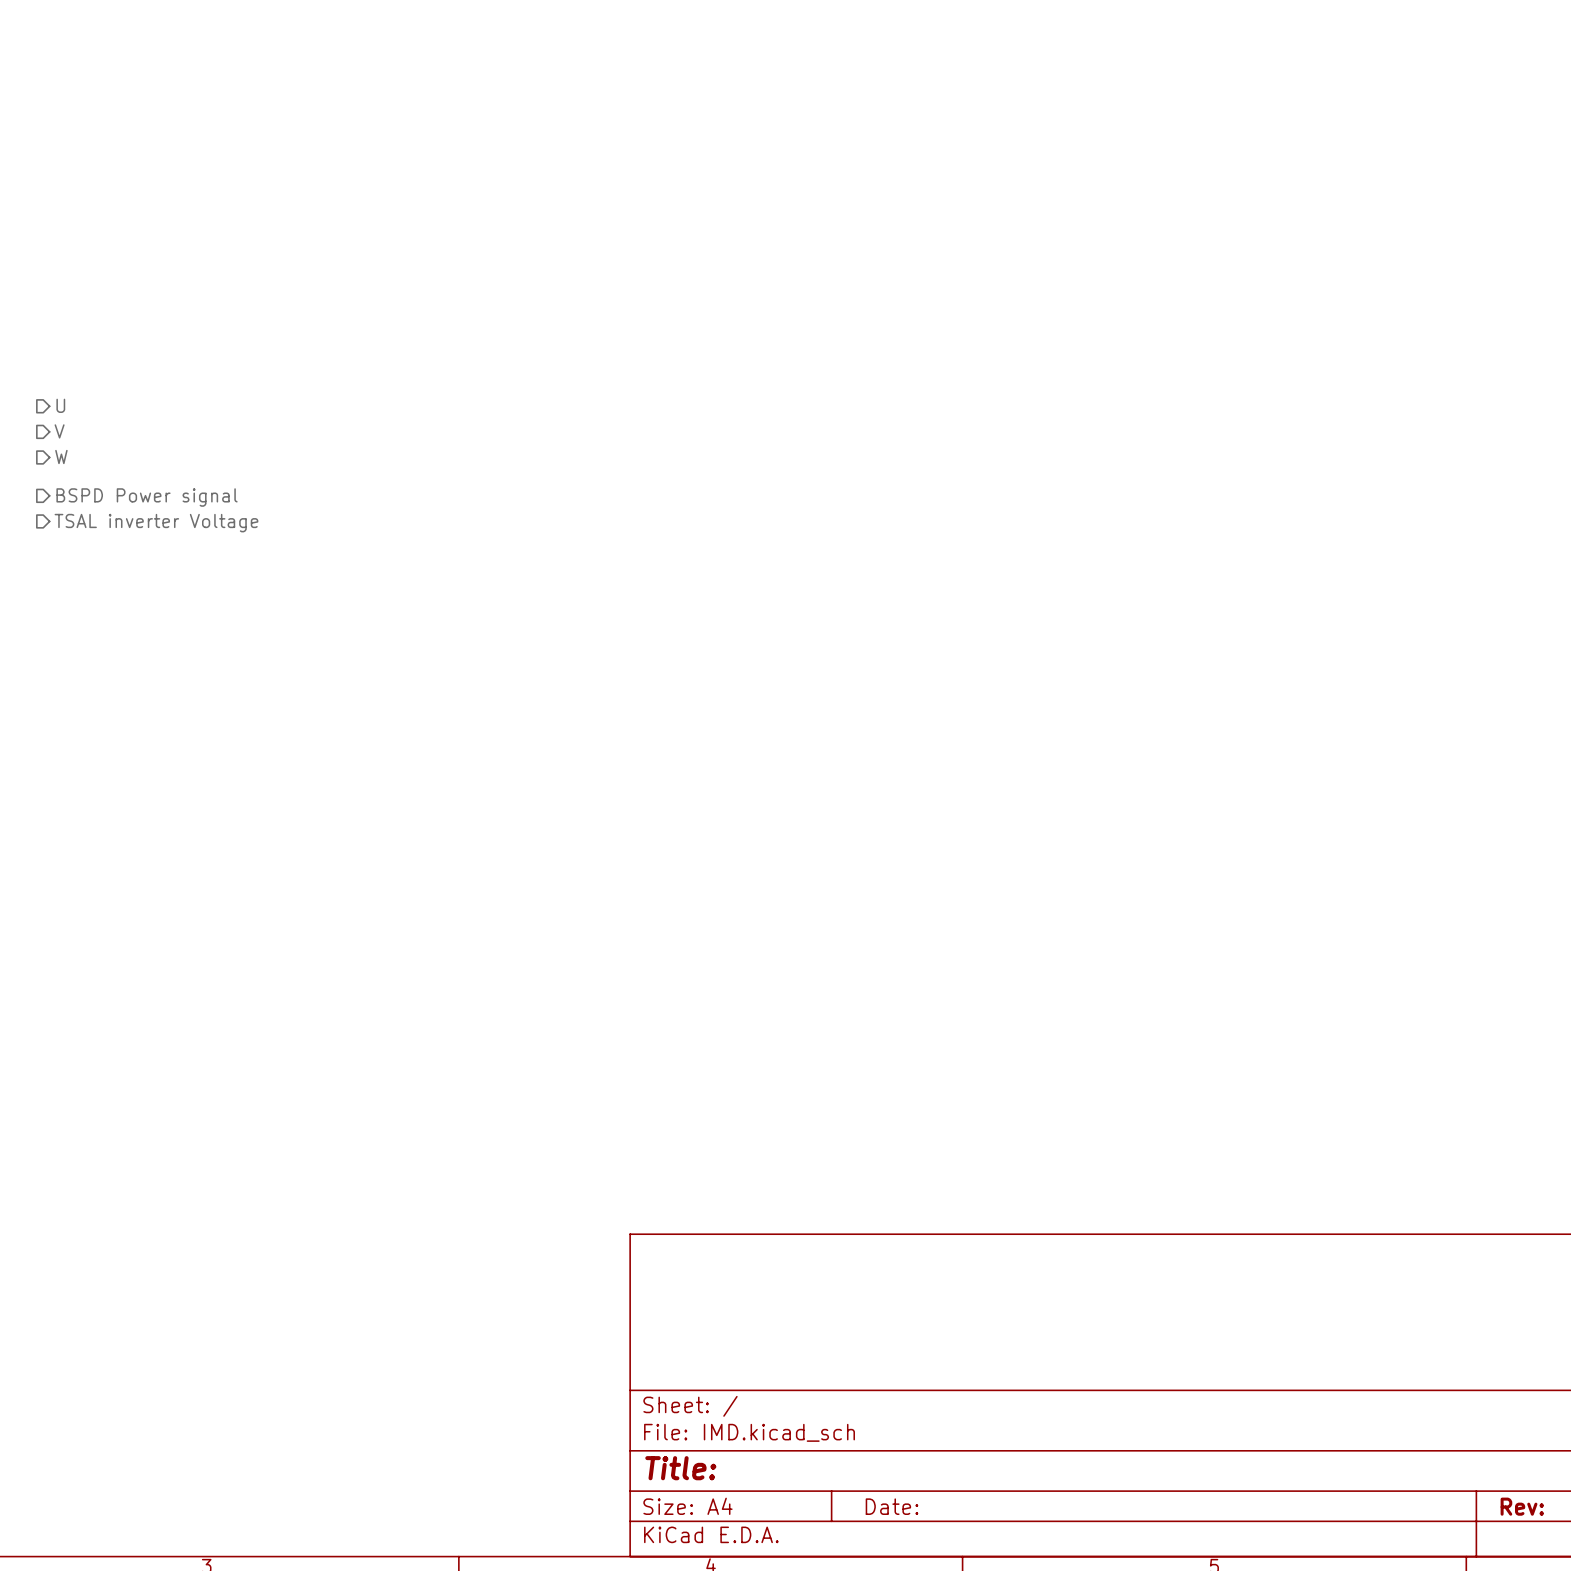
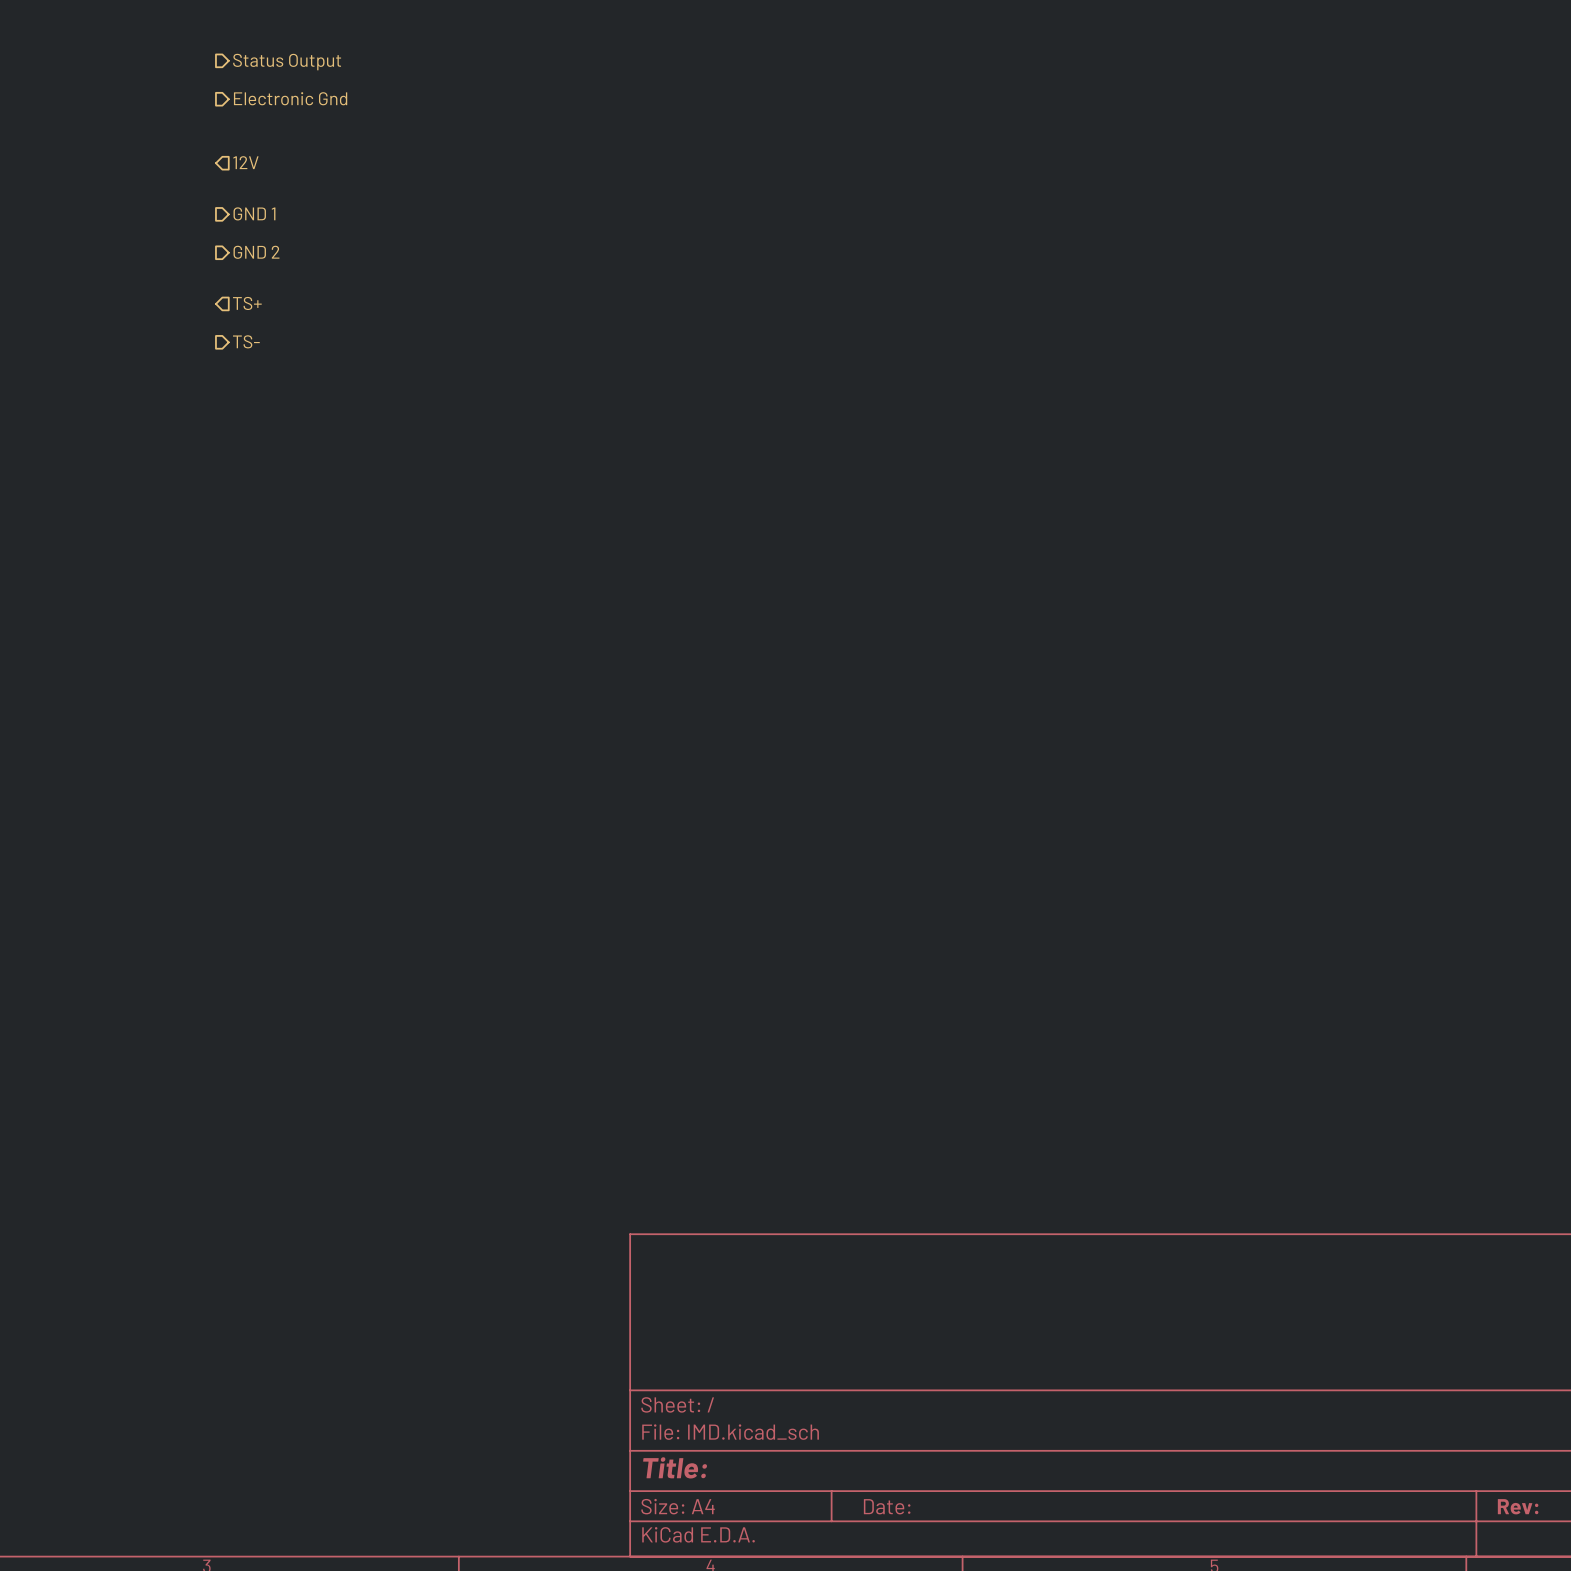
hierarchical label: none -> Status Output (287, 62)
hierarchical label: none -> Electronic Gnd (290, 98)
hierarchical label: none -> 12V (245, 162)
hierarchical label: none -> GND 1 (254, 213)
hierarchical label: none -> GND 2 (256, 252)
hierarchical label: none -> TS+ (247, 303)
hierarchical label: none -> TS- (246, 341)
hierarchical label: U (60, 405) -> none
hierarchical label: V (59, 431) -> none
hierarchical label: W (61, 457) -> none
hierarchical label: BSPD Power signal (147, 497) -> none
hierarchical label: TSAL inverter Voltage (156, 523) -> none

